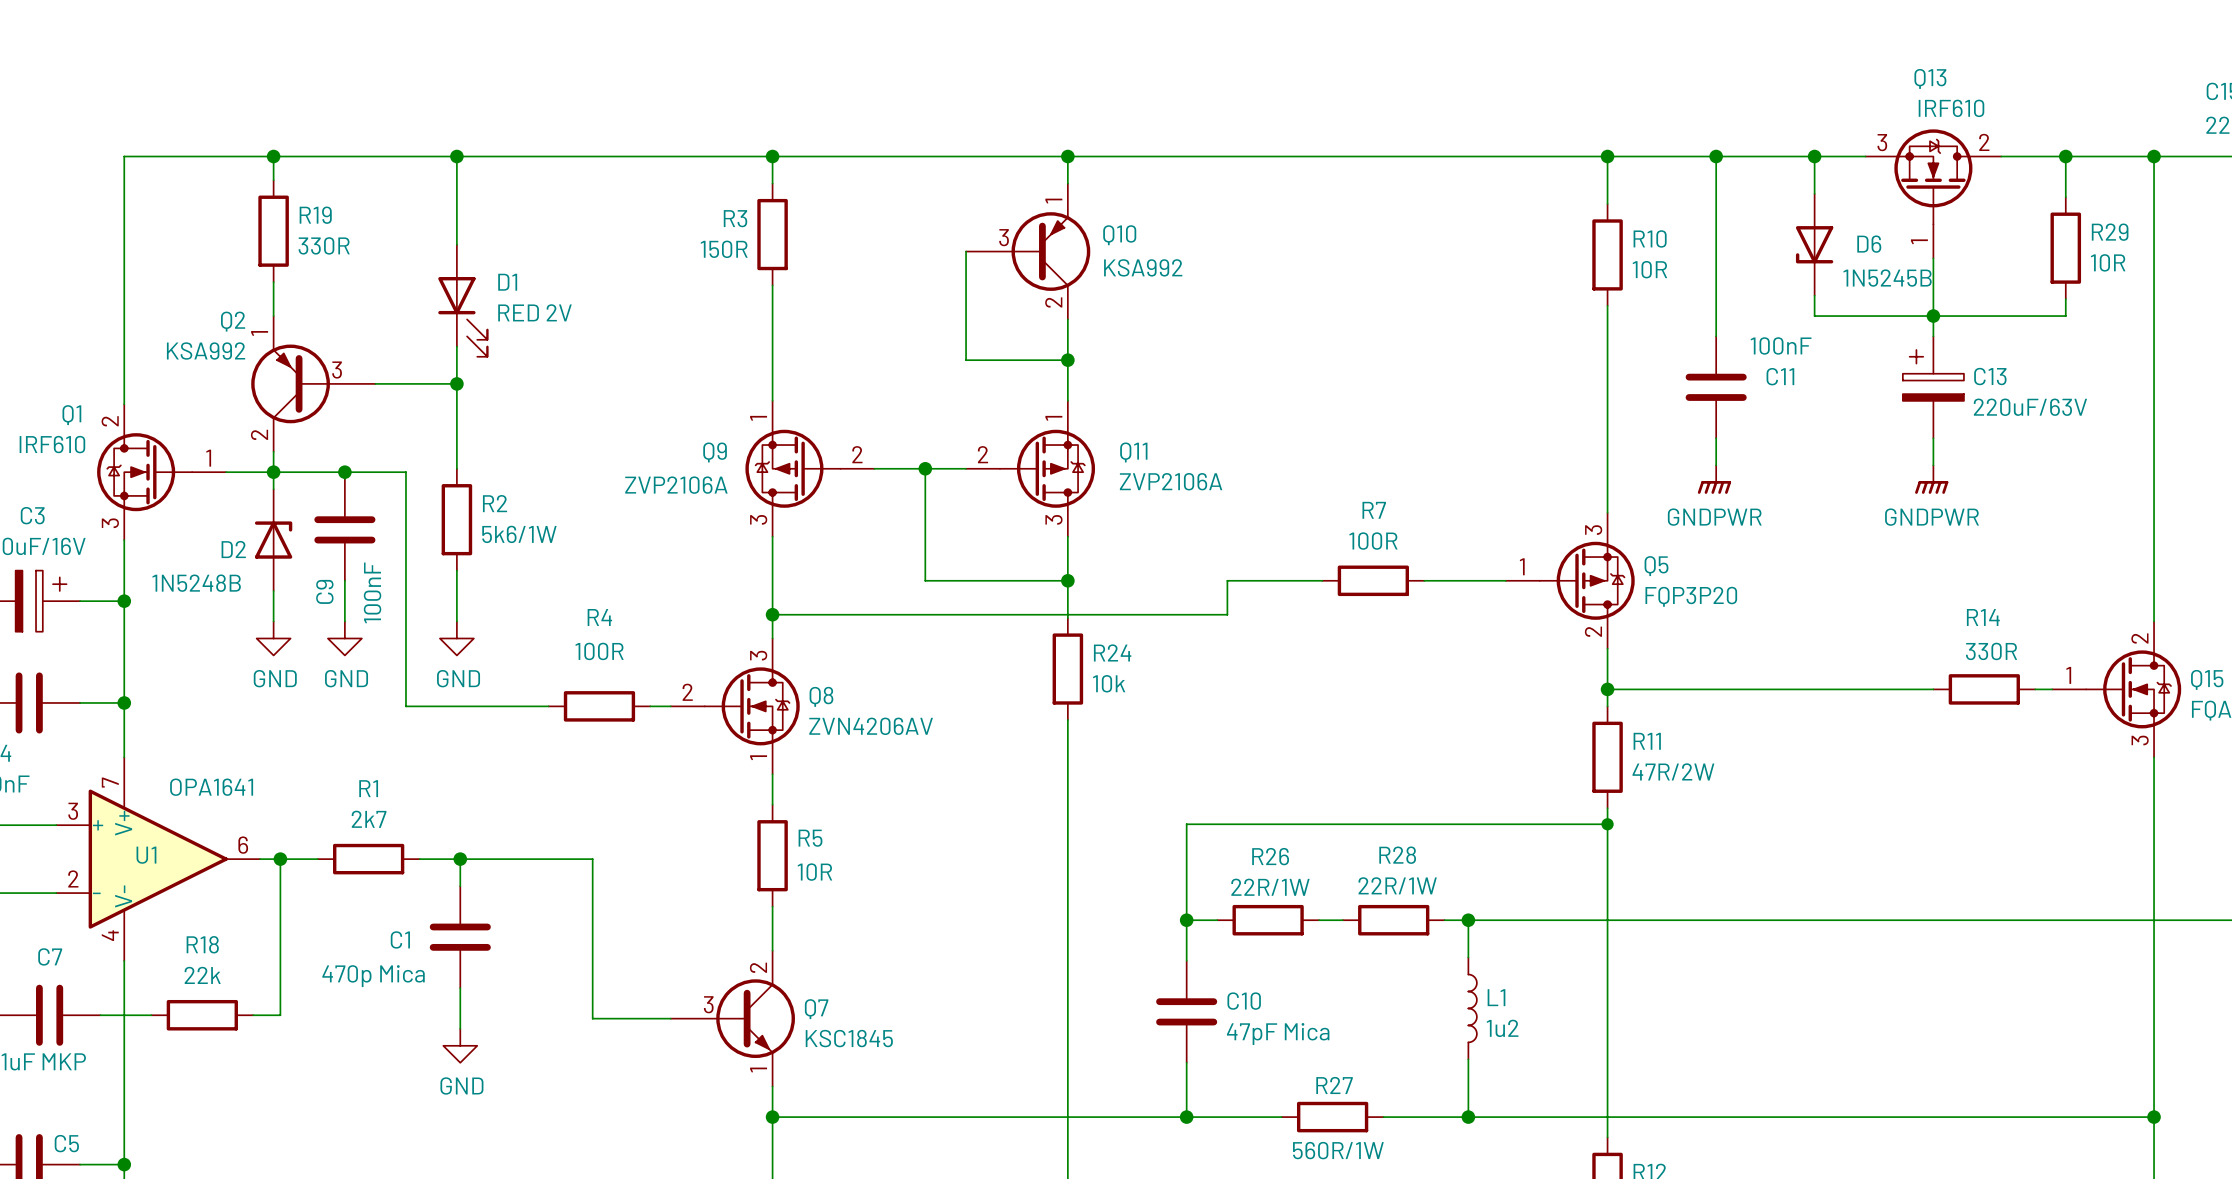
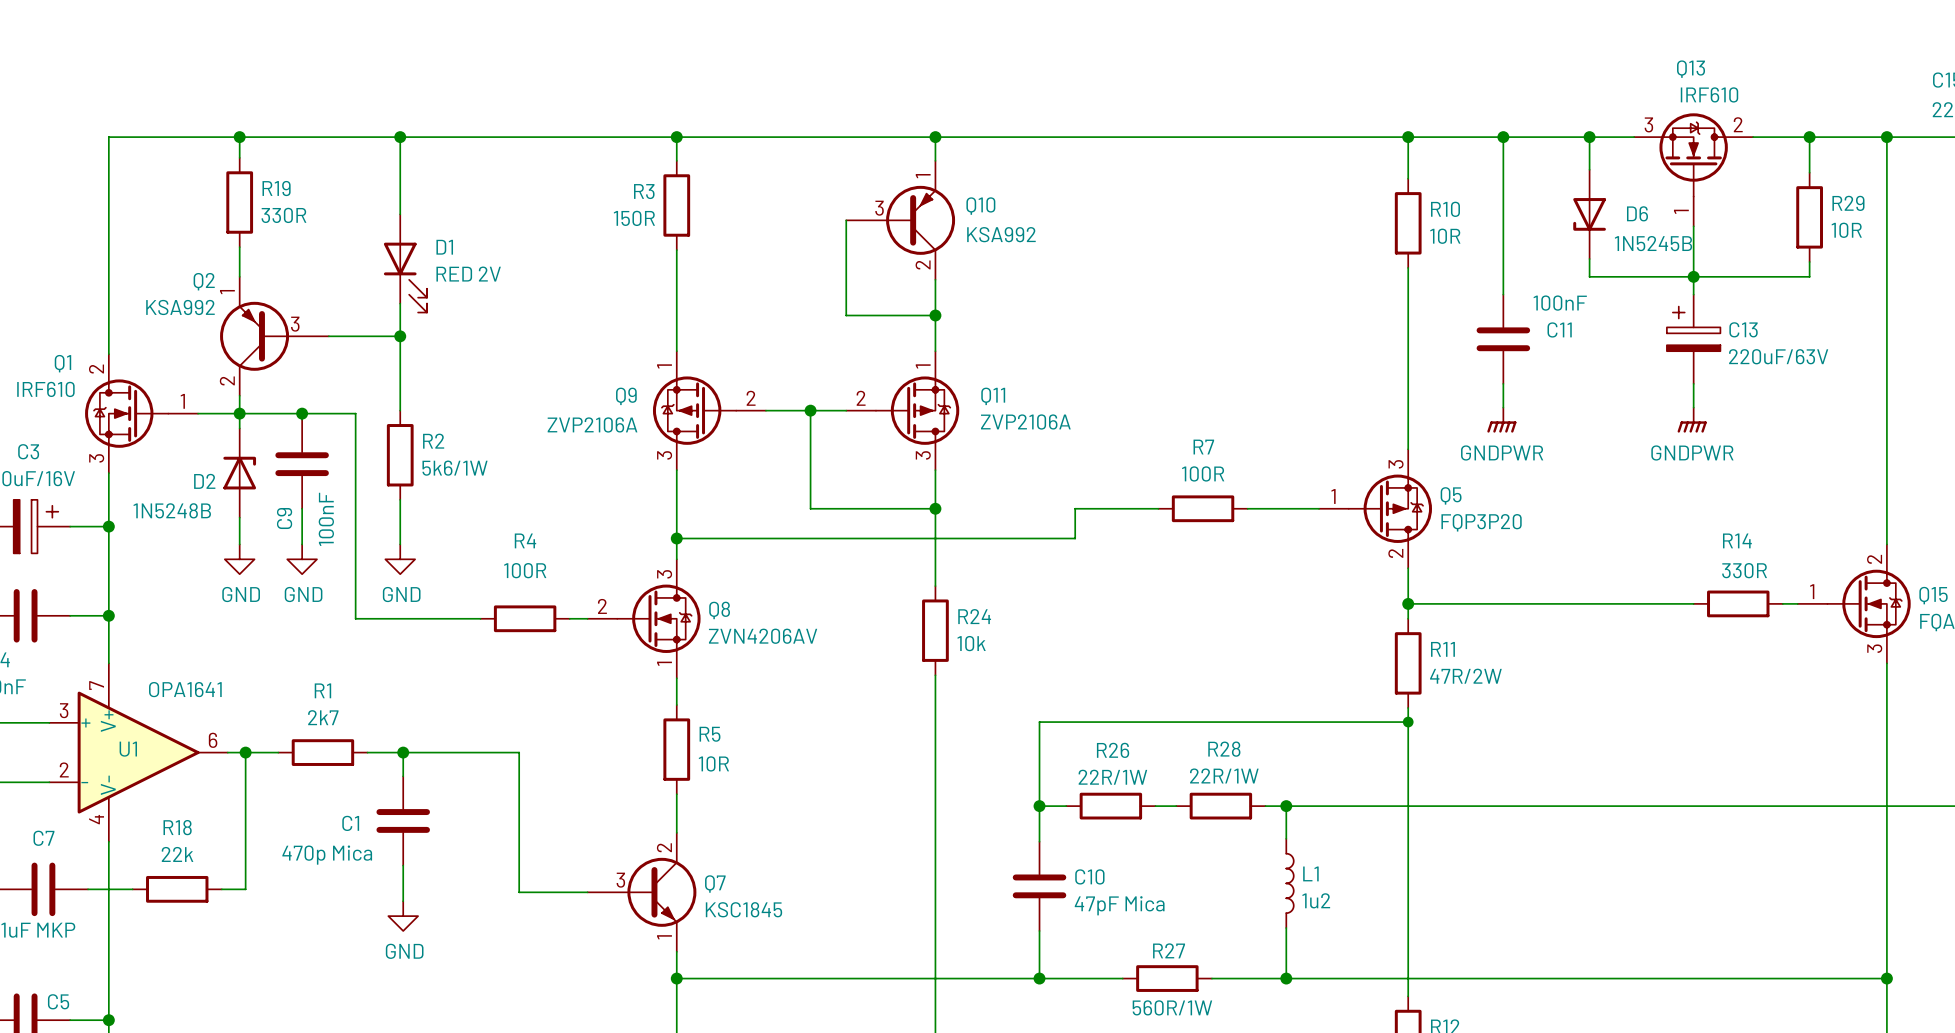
R24 position: (1067, 669) -> (935, 630)
wire: (1067, 719) (1067, 770) -> (935, 541) (935, 586)

